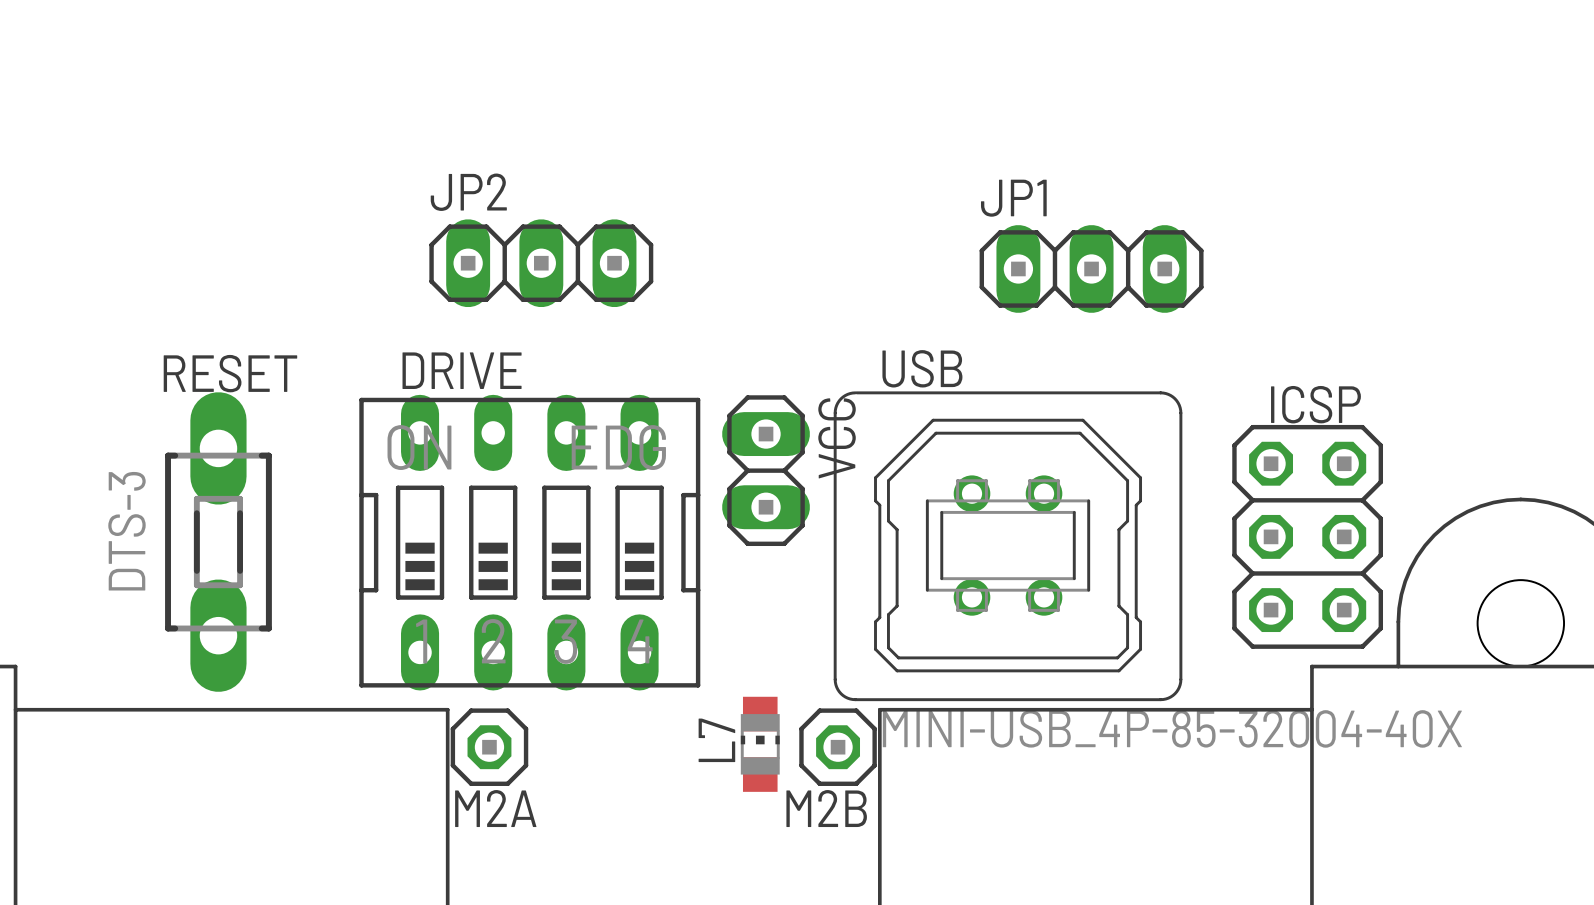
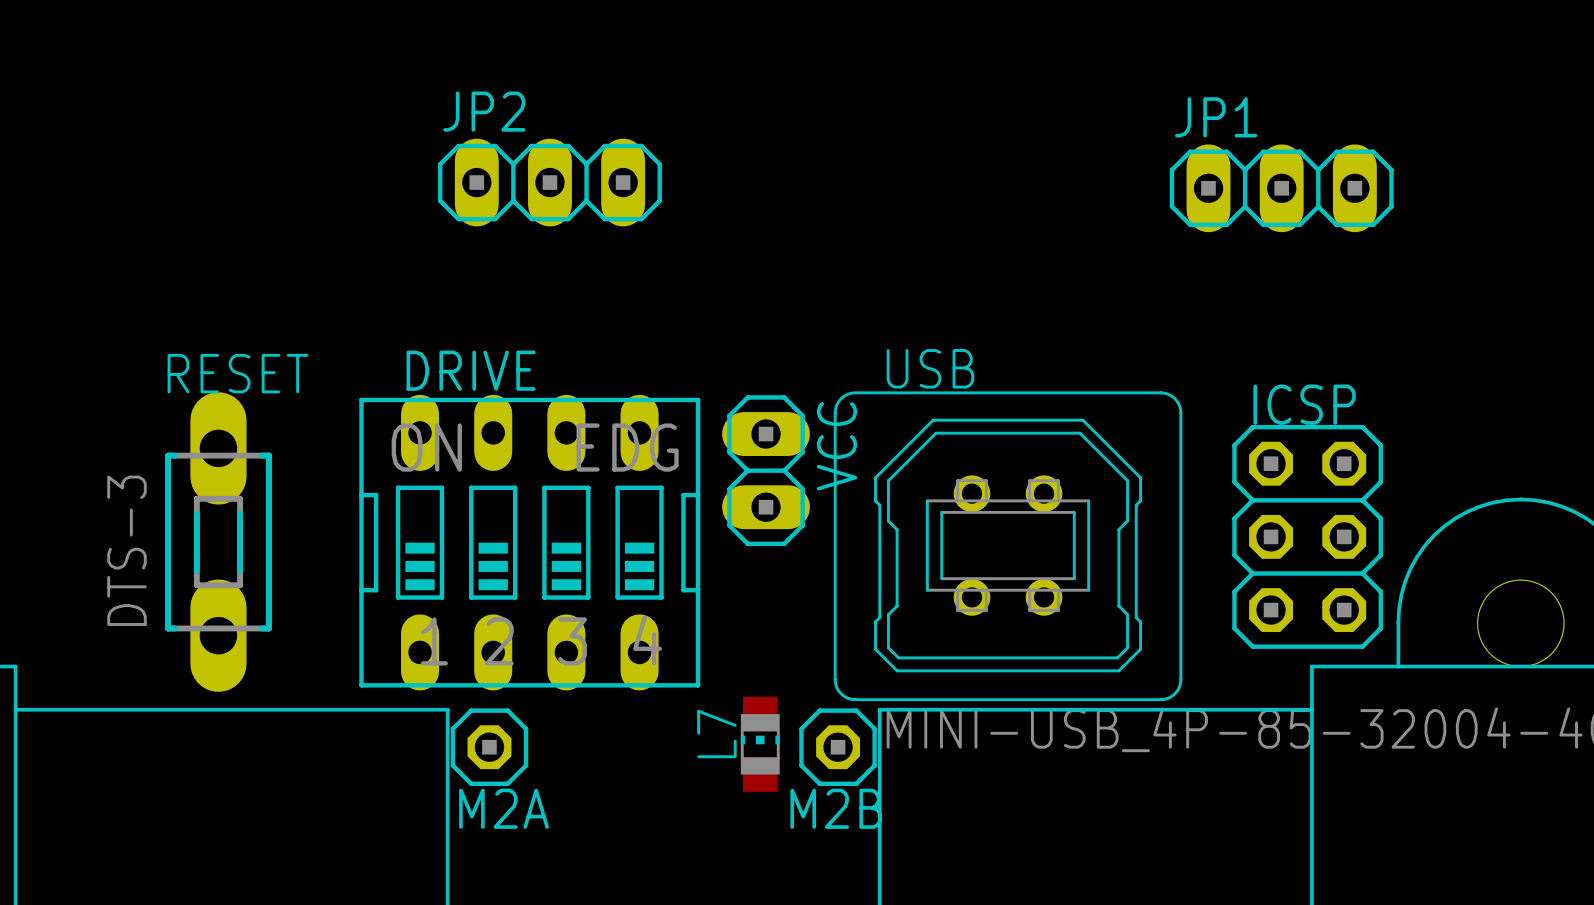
JP2 position: (541, 263) -> (549, 182)
JP1 position: (1091, 268) -> (1281, 188)

